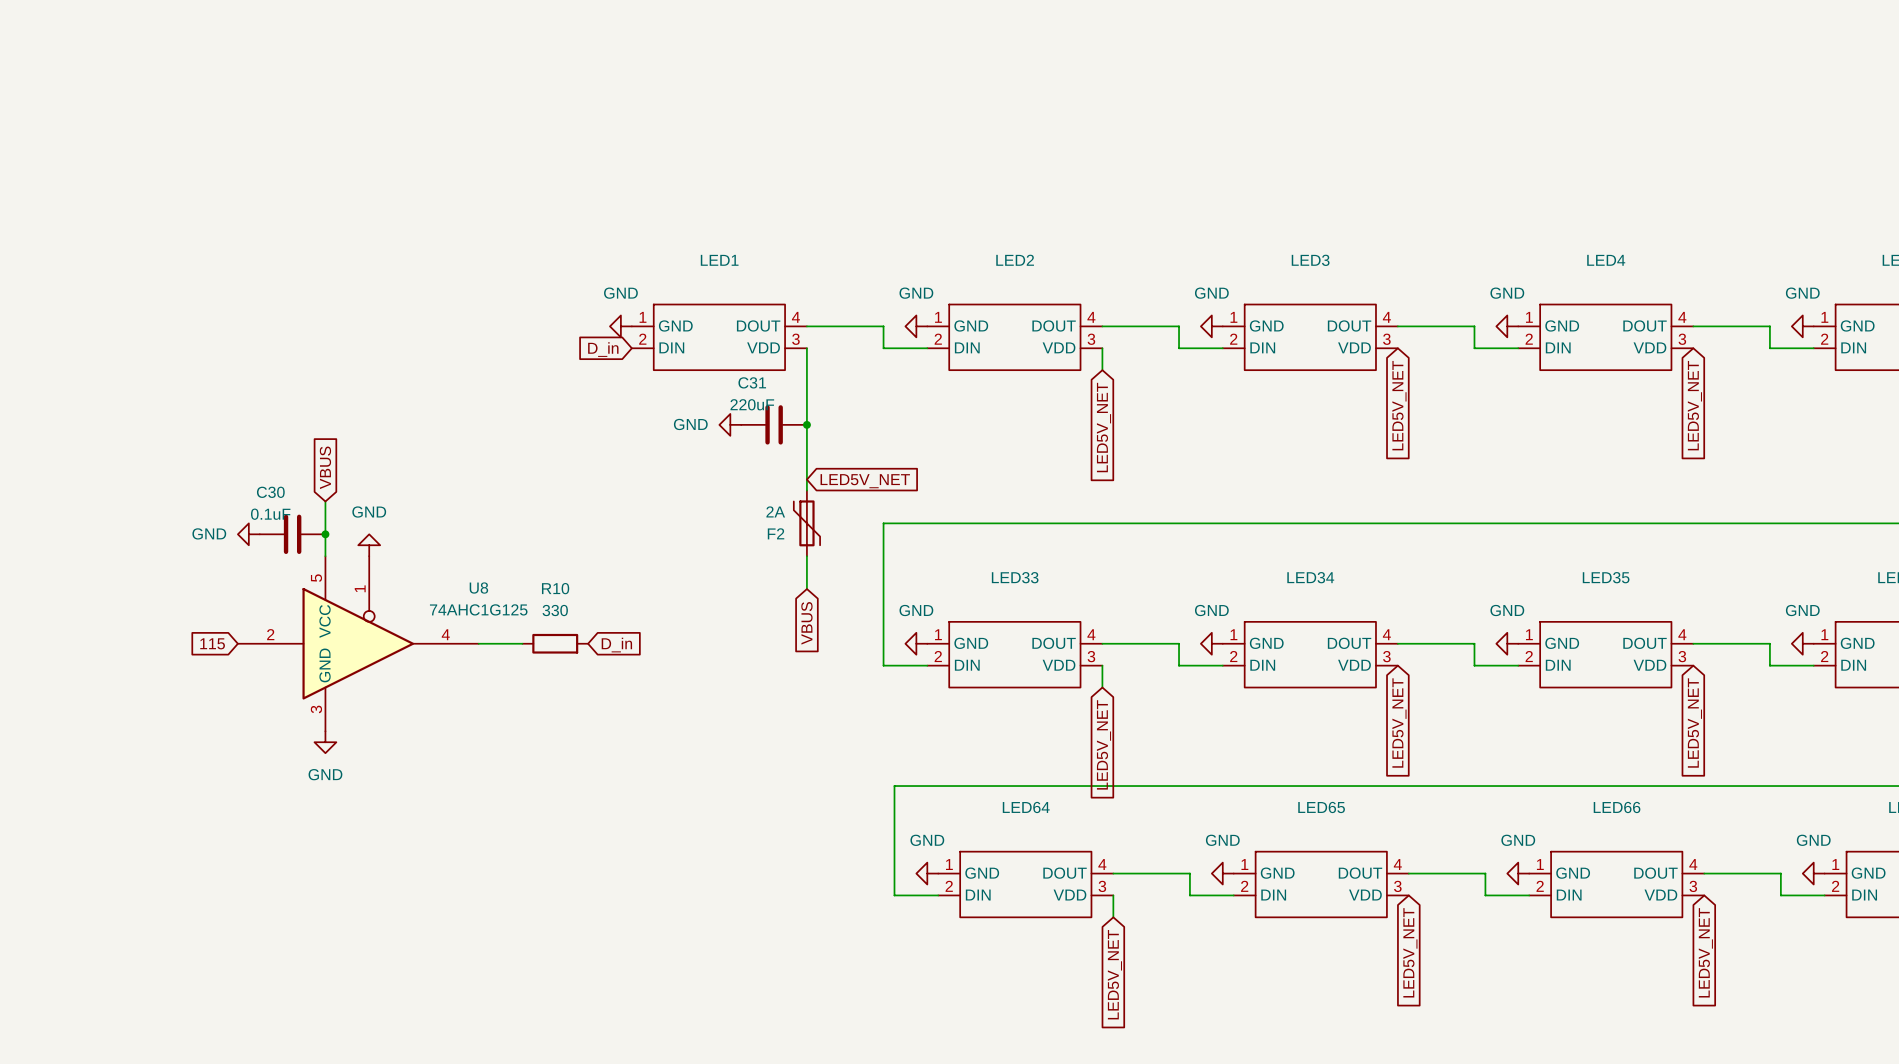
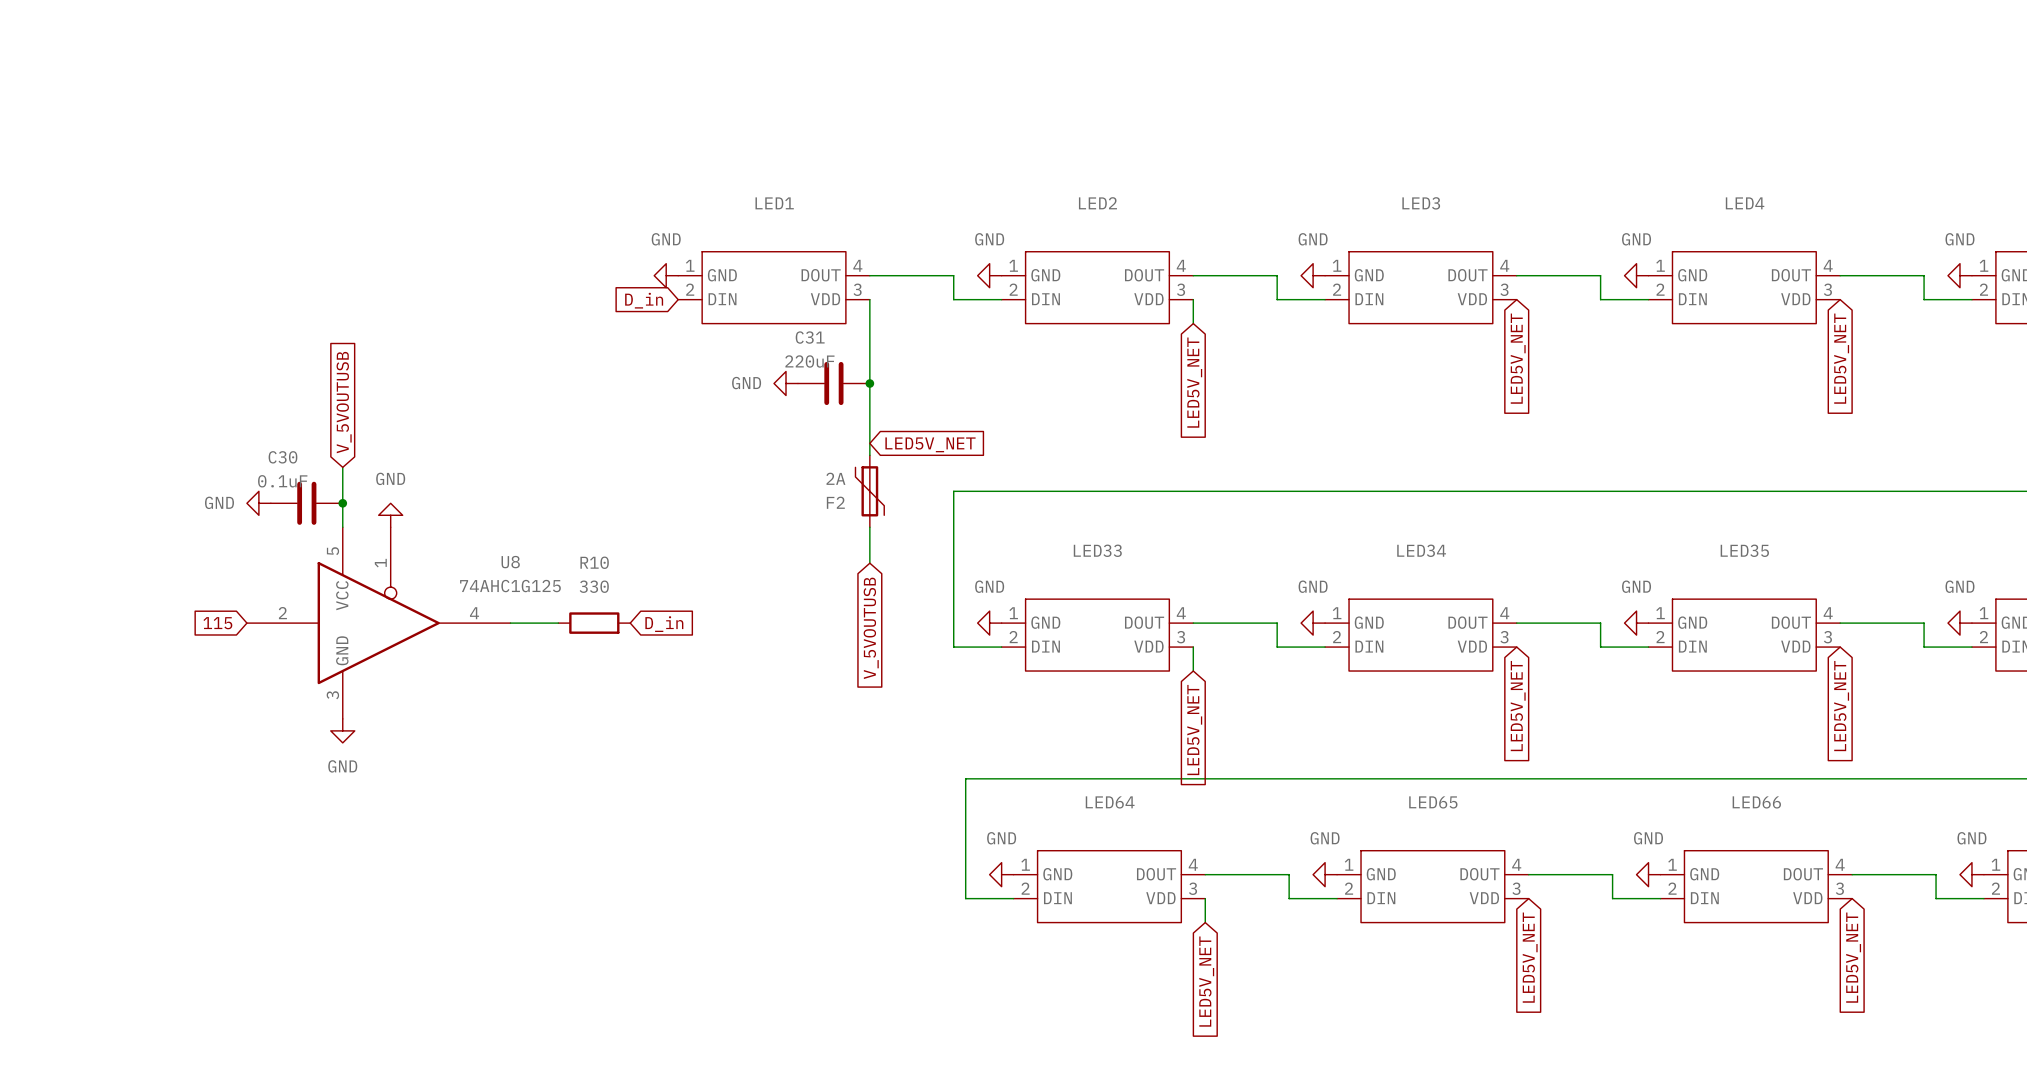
global label: VBUS (325, 467) -> V_5VOUTUSB (344, 402)
global label: VBUS (806, 623) -> V_5VOUTUSB (871, 628)

